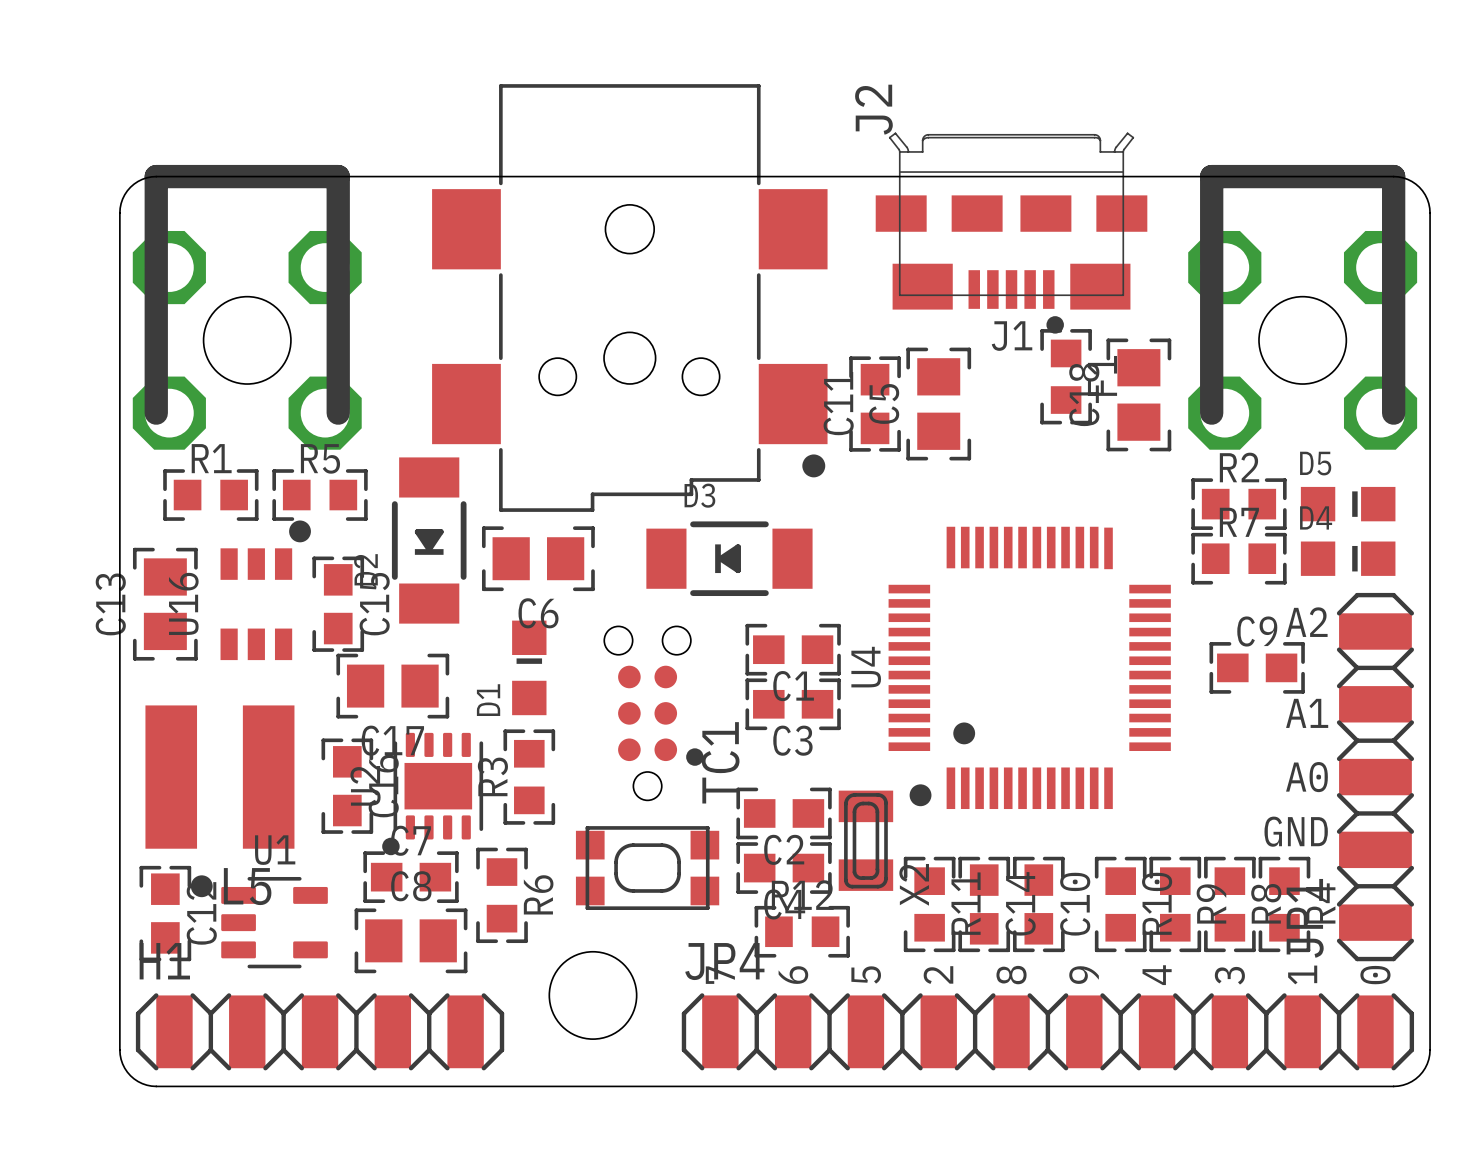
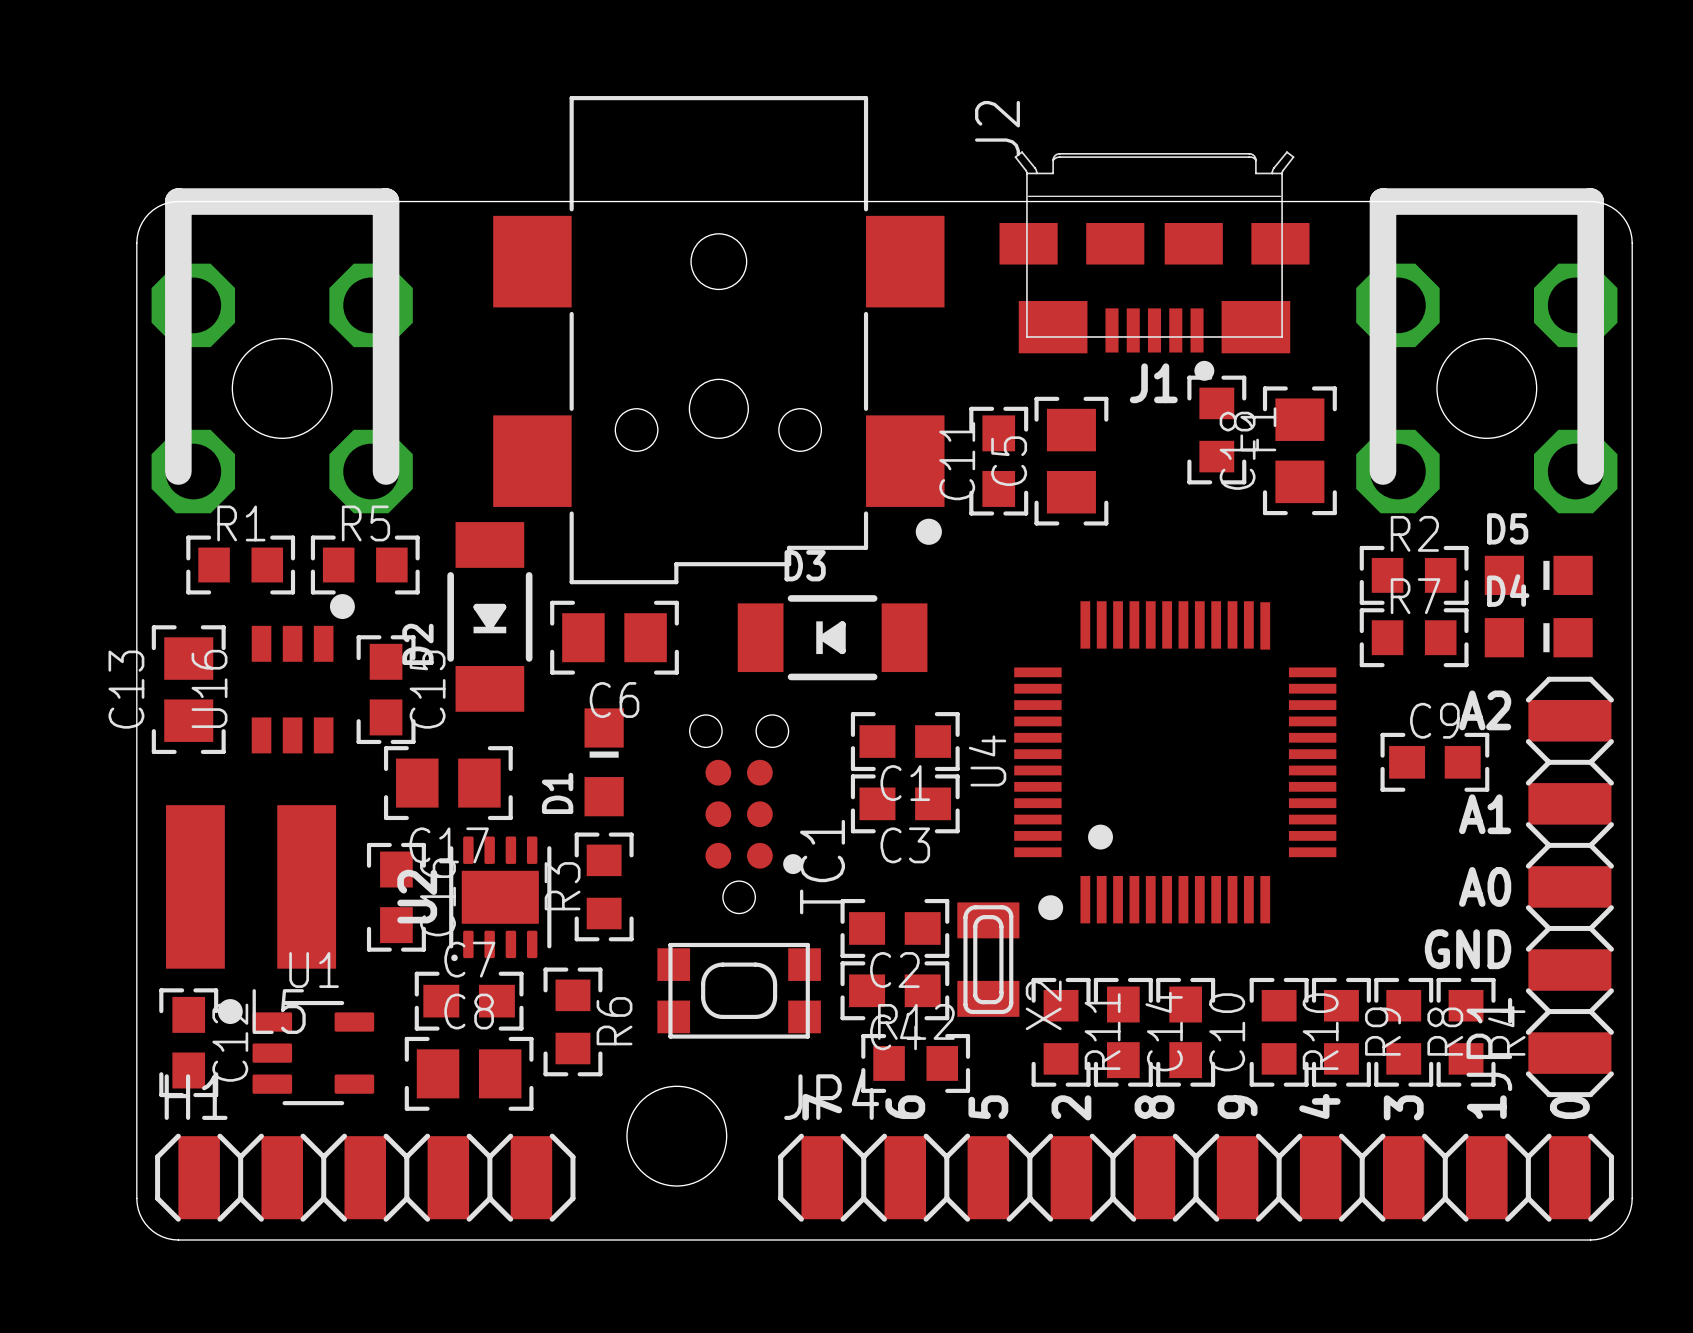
U2 footprint: [382, 732, 484, 856] -> [449, 836, 552, 962]

